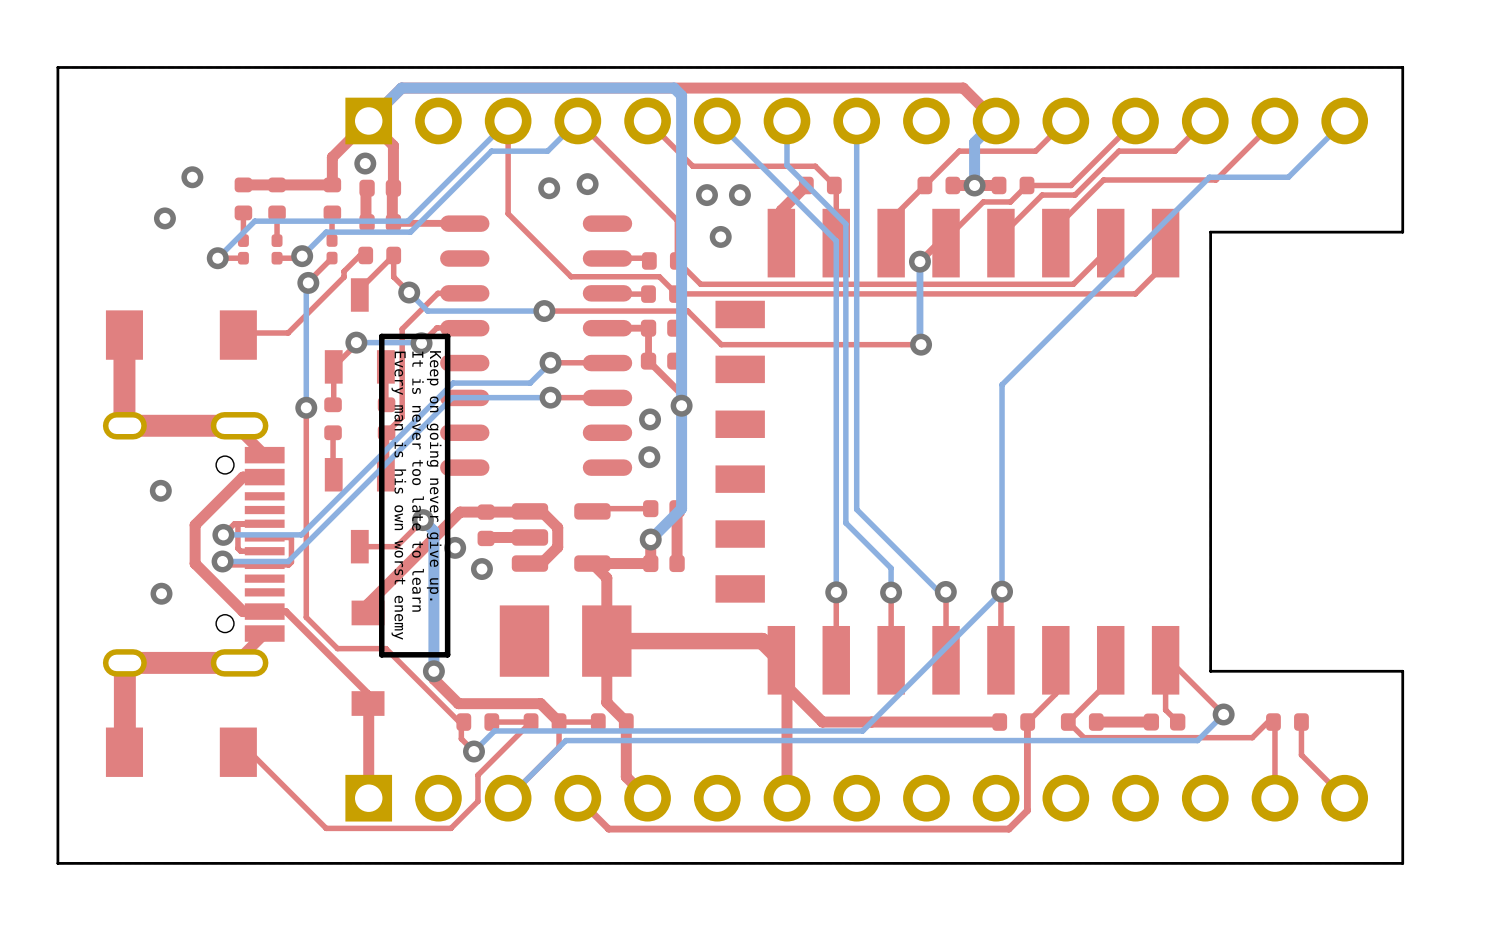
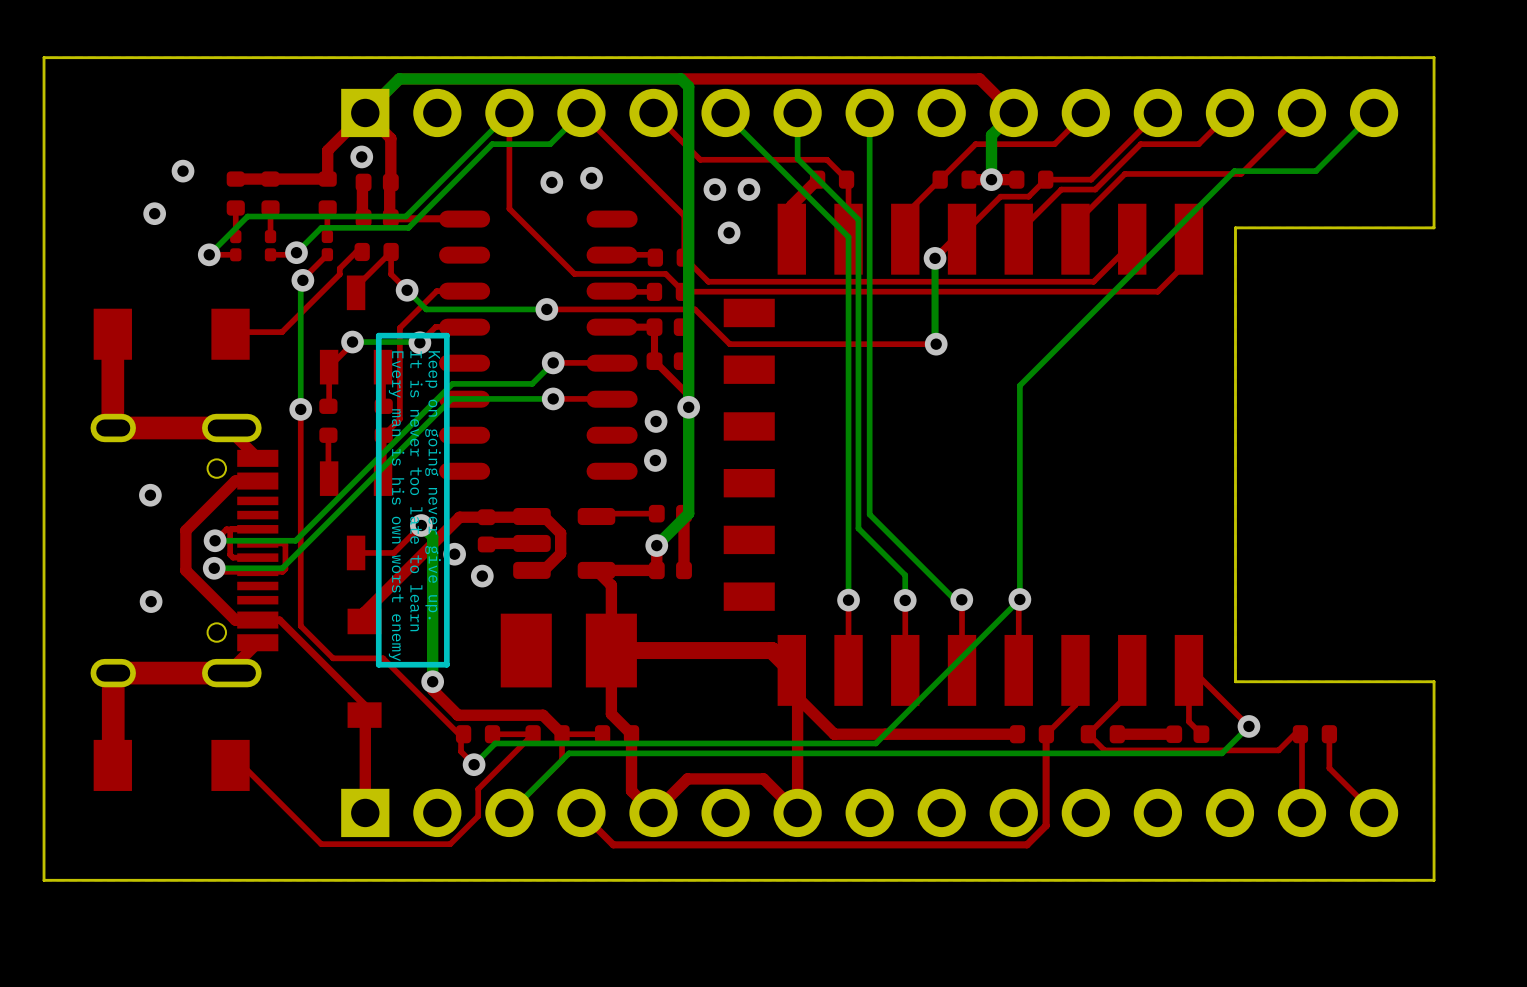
top track: none -> (797, 812) (763, 778) (687, 778) (653, 812)

